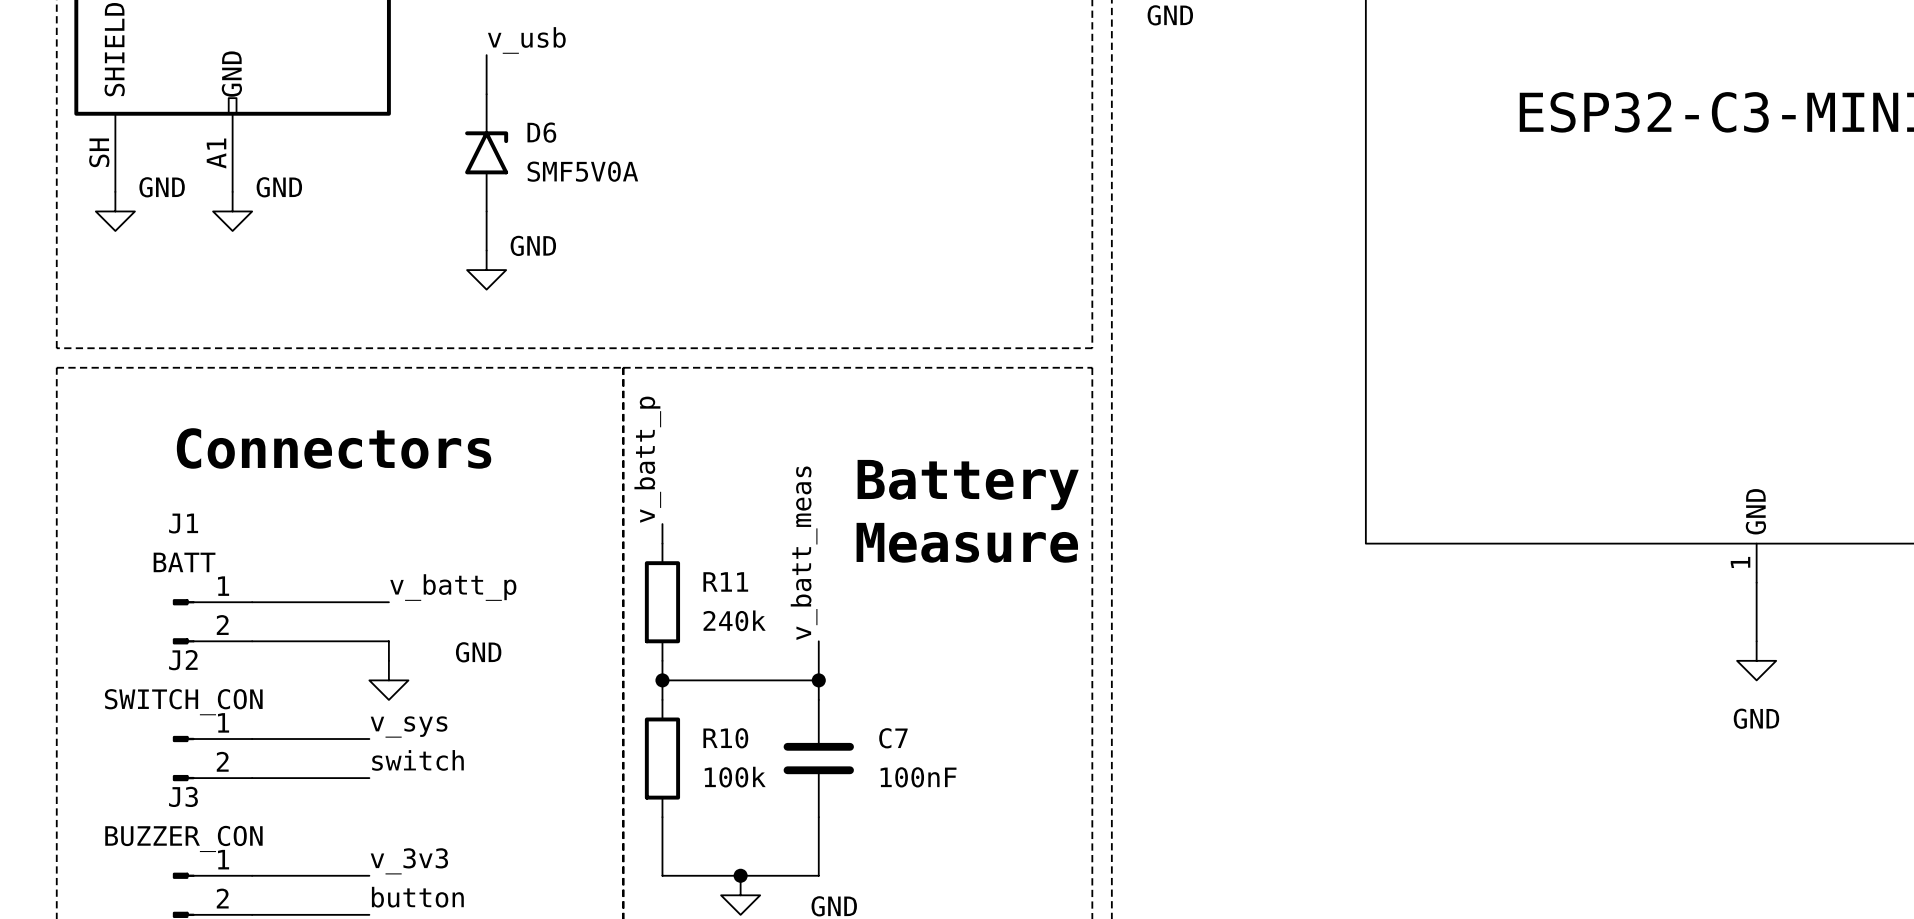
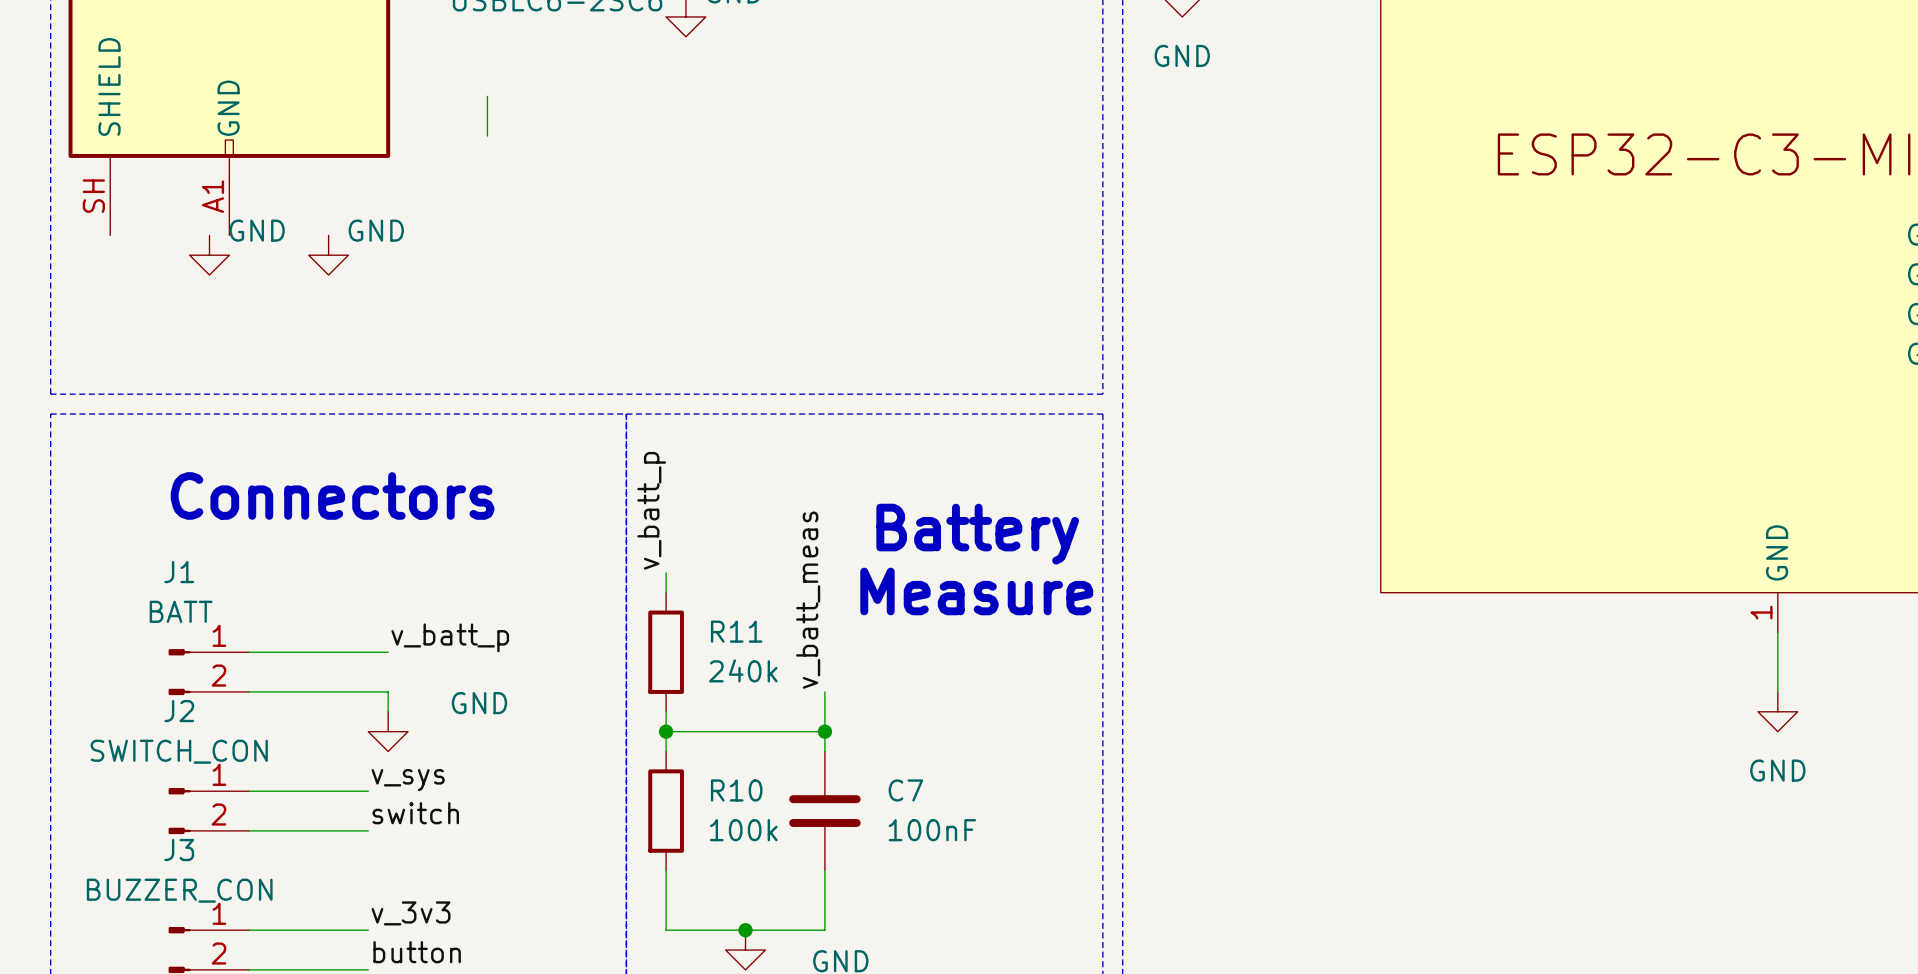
label: v_usb (526, 40) -> none
D6: SMF5V0A (486, 152) -> none
power symbol: GND (115, 211) -> none
power symbol position: GND (232, 211) -> GND (209, 255)
power symbol: none -> GND (328, 255)
wire: (486, 211) (486, 250) -> none
power symbol: GND (486, 270) -> none

